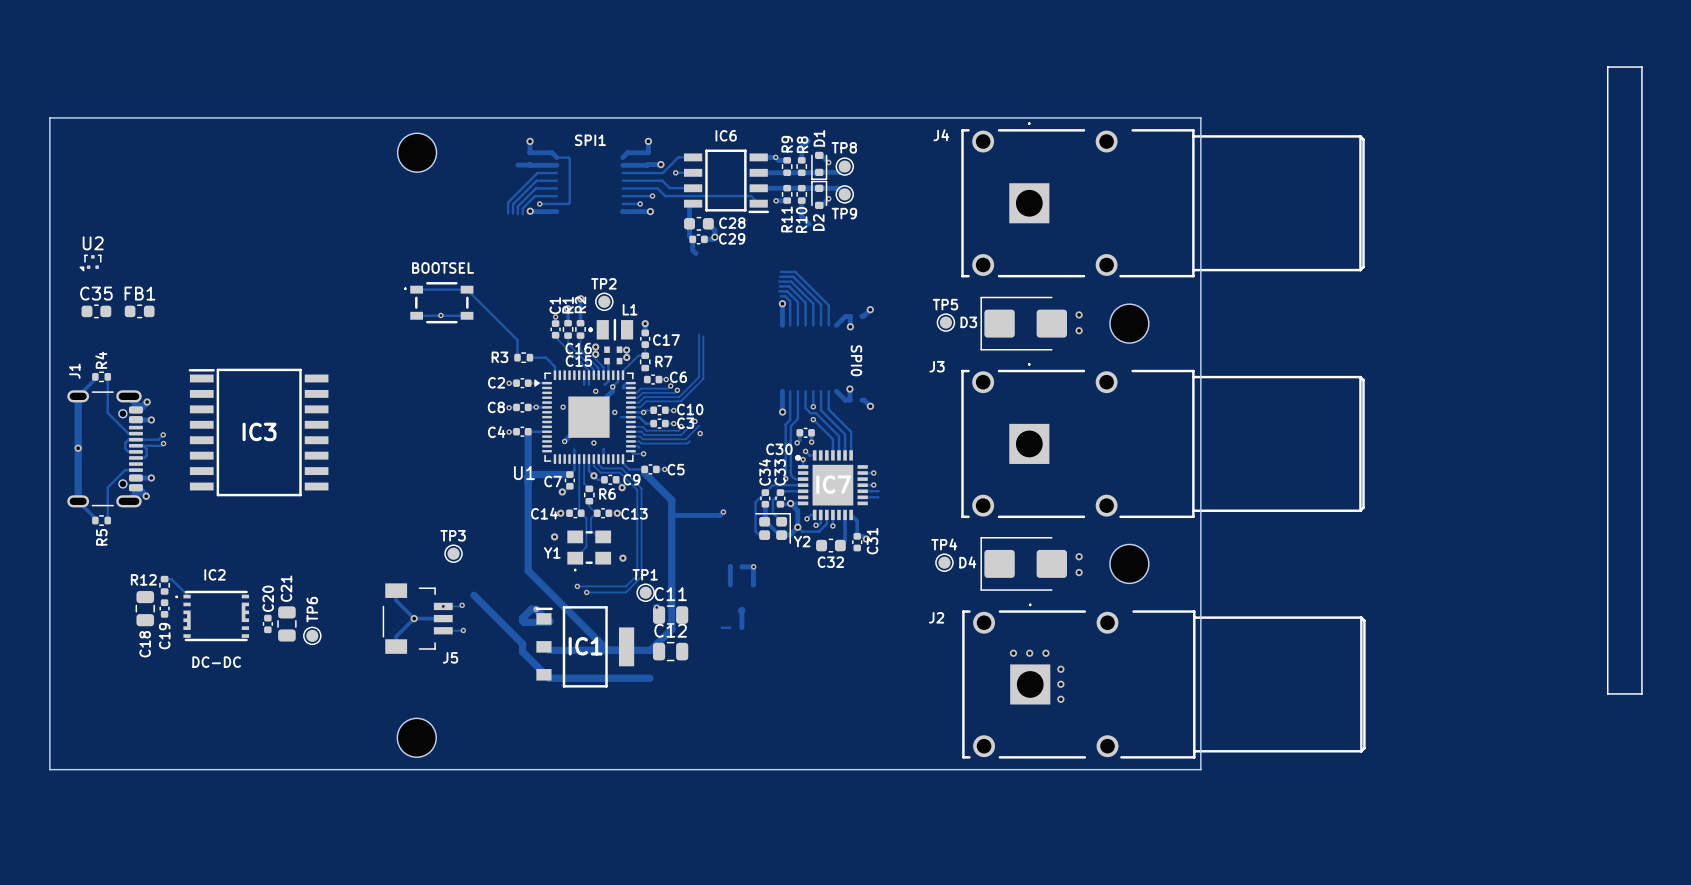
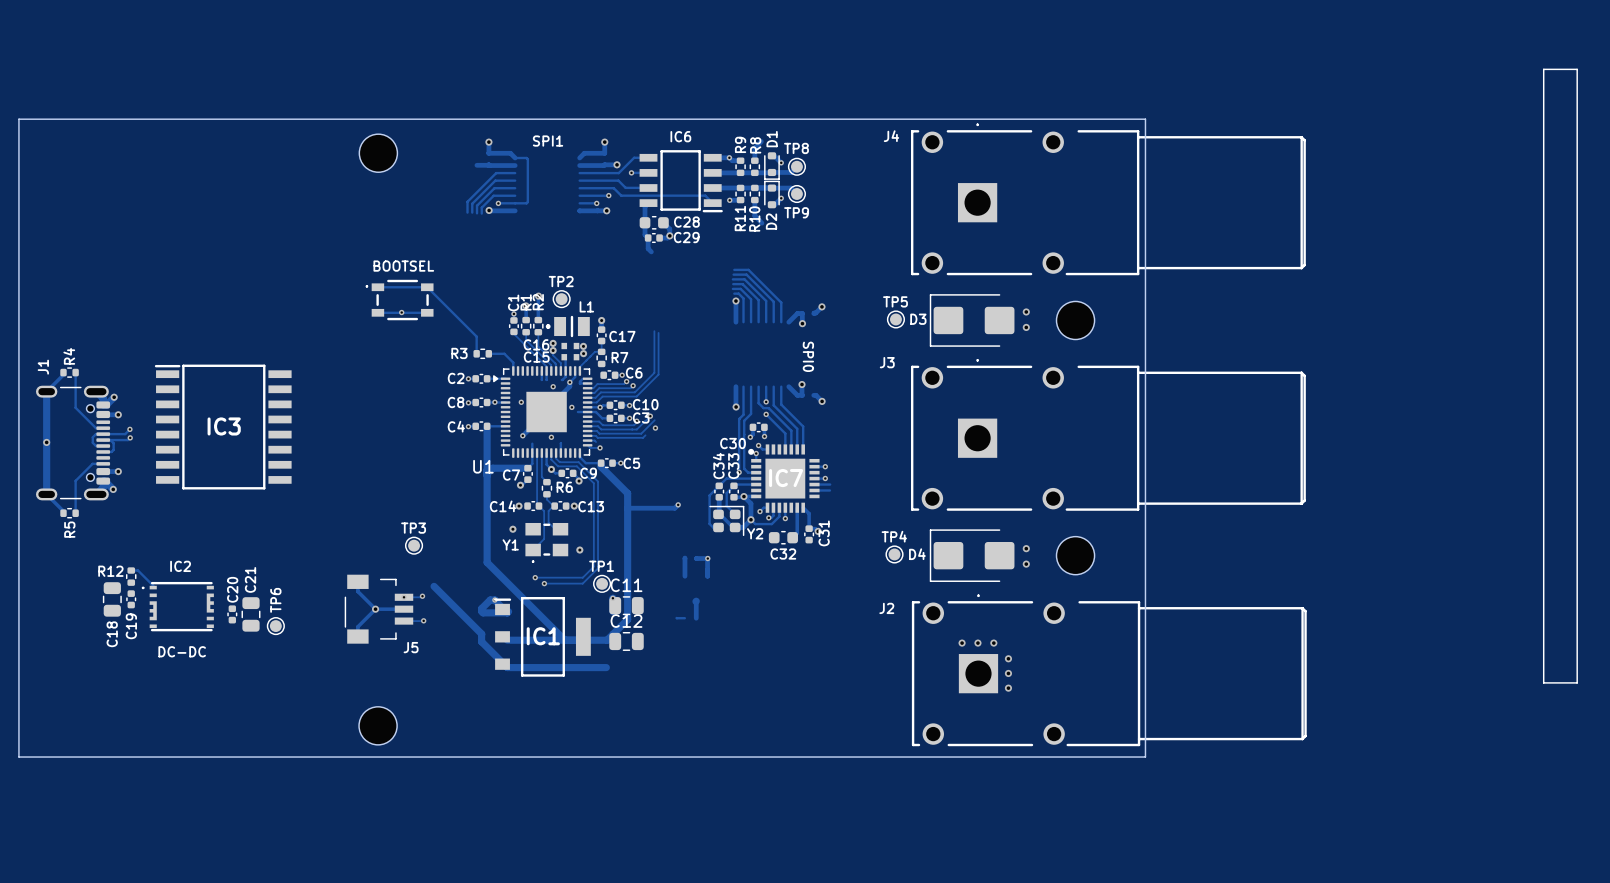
U2: (90, 262) -> none
C35: (96, 311) -> none
FB1: (139, 311) -> none

